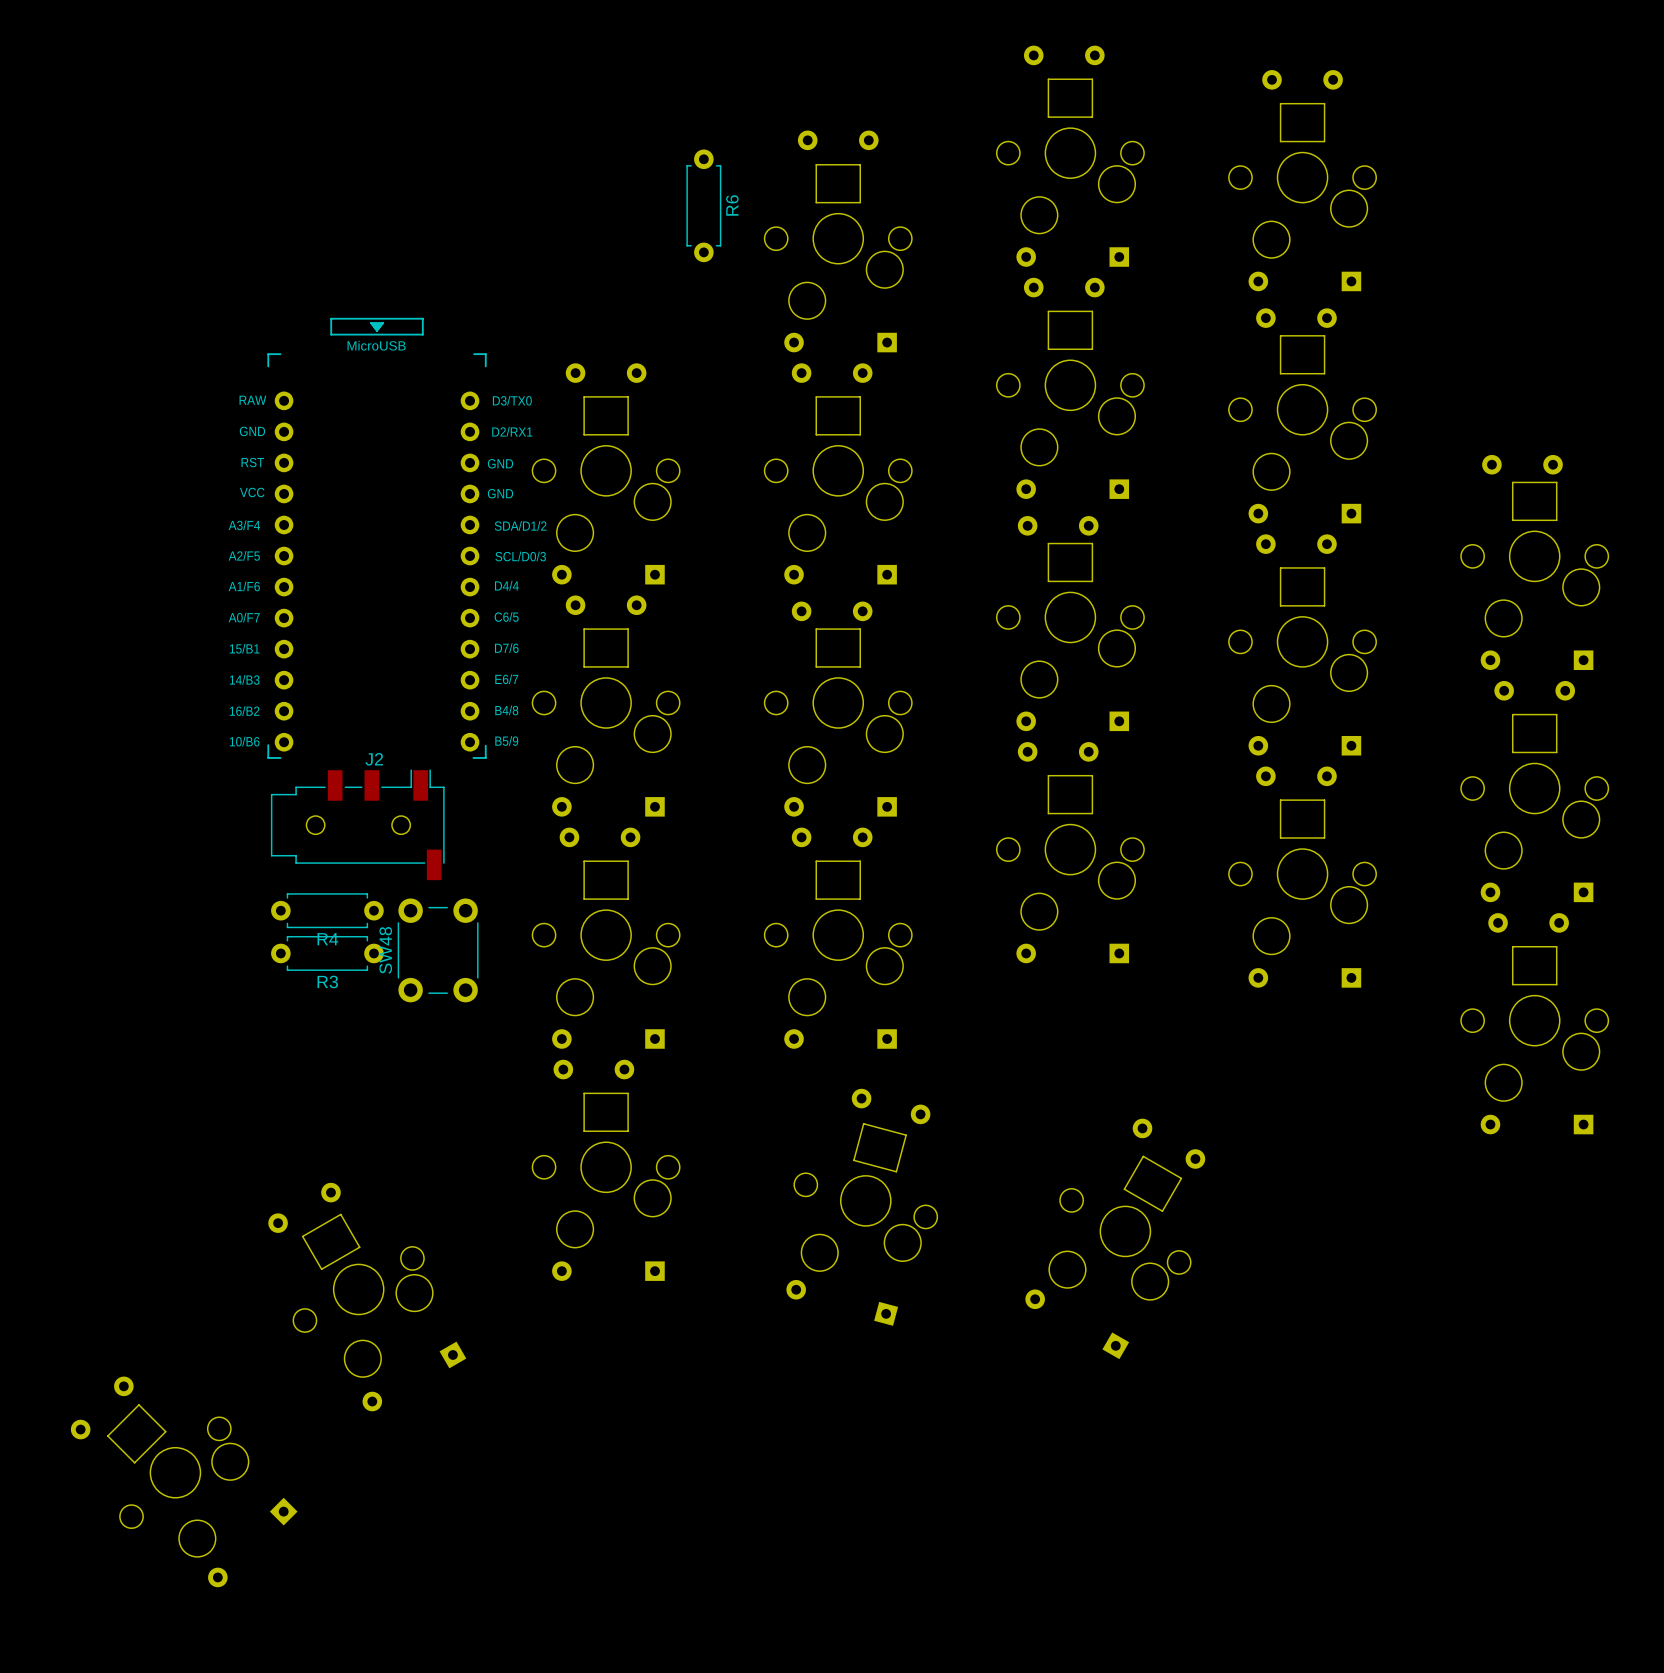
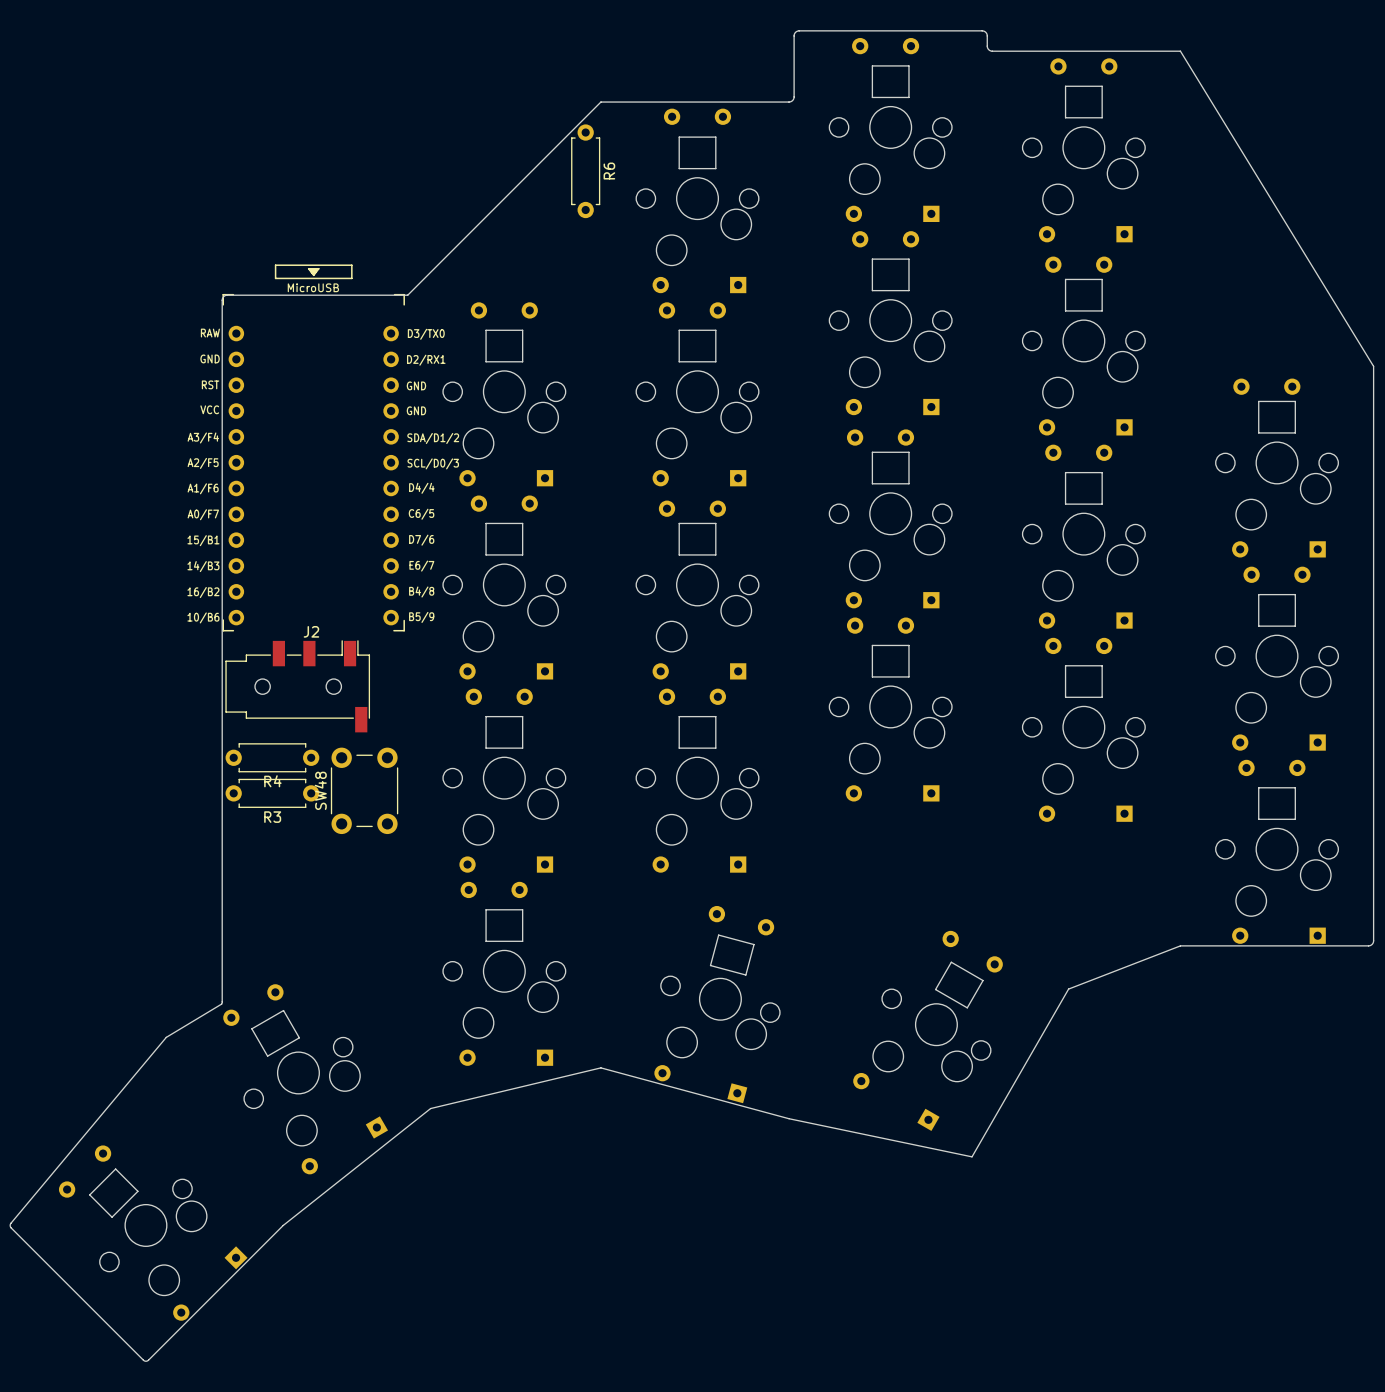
board edge: none -> (799, 30) (982, 30) (987, 34) (987, 48) (992, 51) (1180, 51) (1373, 366) (1373, 942) (1368, 945) (1180, 945) (1068, 989) (972, 1156) (789, 1118) (600, 1067) (430, 1108) (283, 1225) (148, 1360) (144, 1360) (10, 1225) (166, 1037) (222, 1002) (222, 298) (227, 295) (407, 295) (600, 102) (792, 100) (794, 96) (794, 35) (799, 30)

